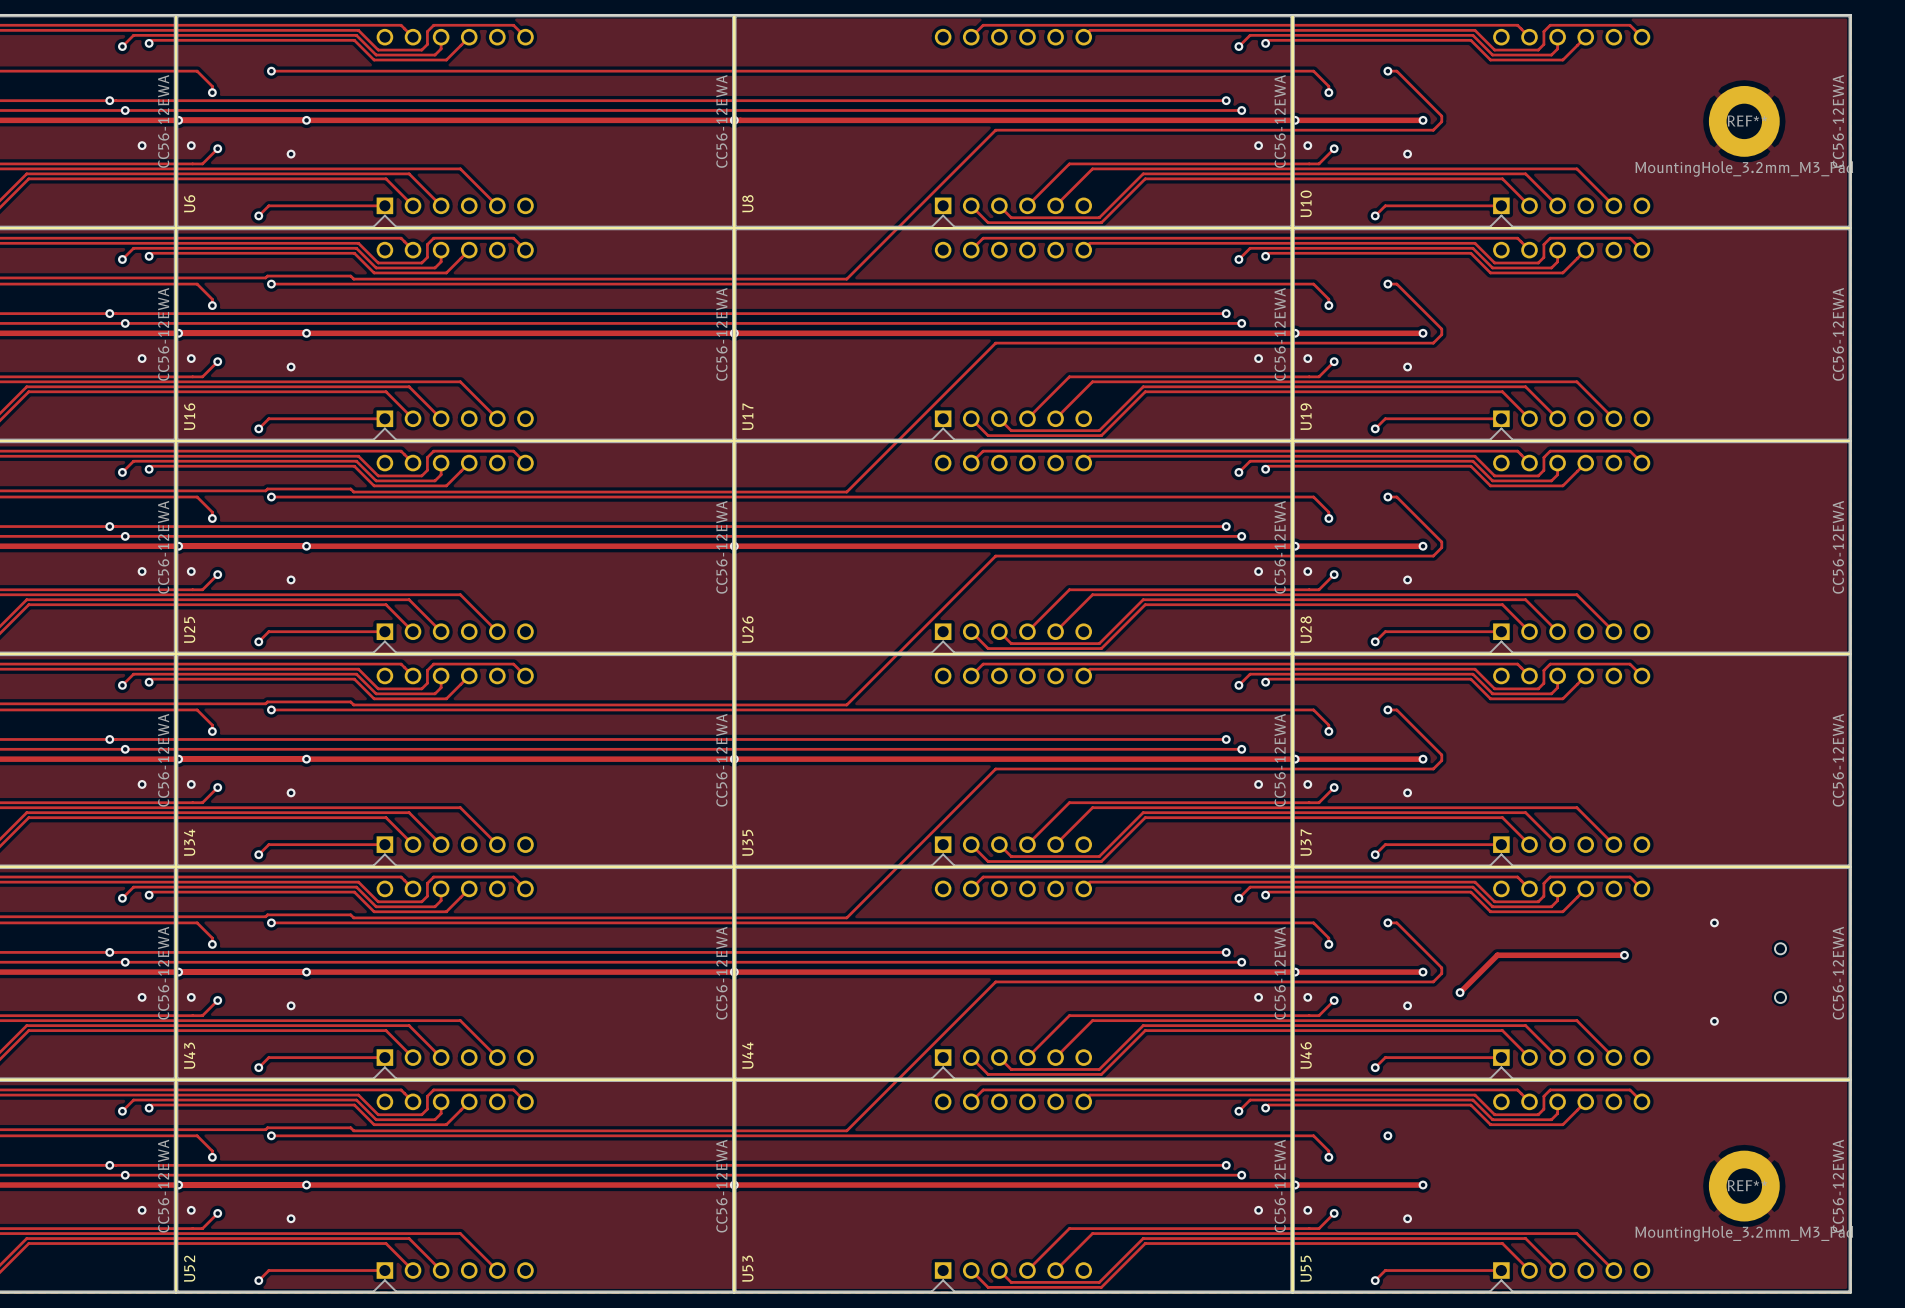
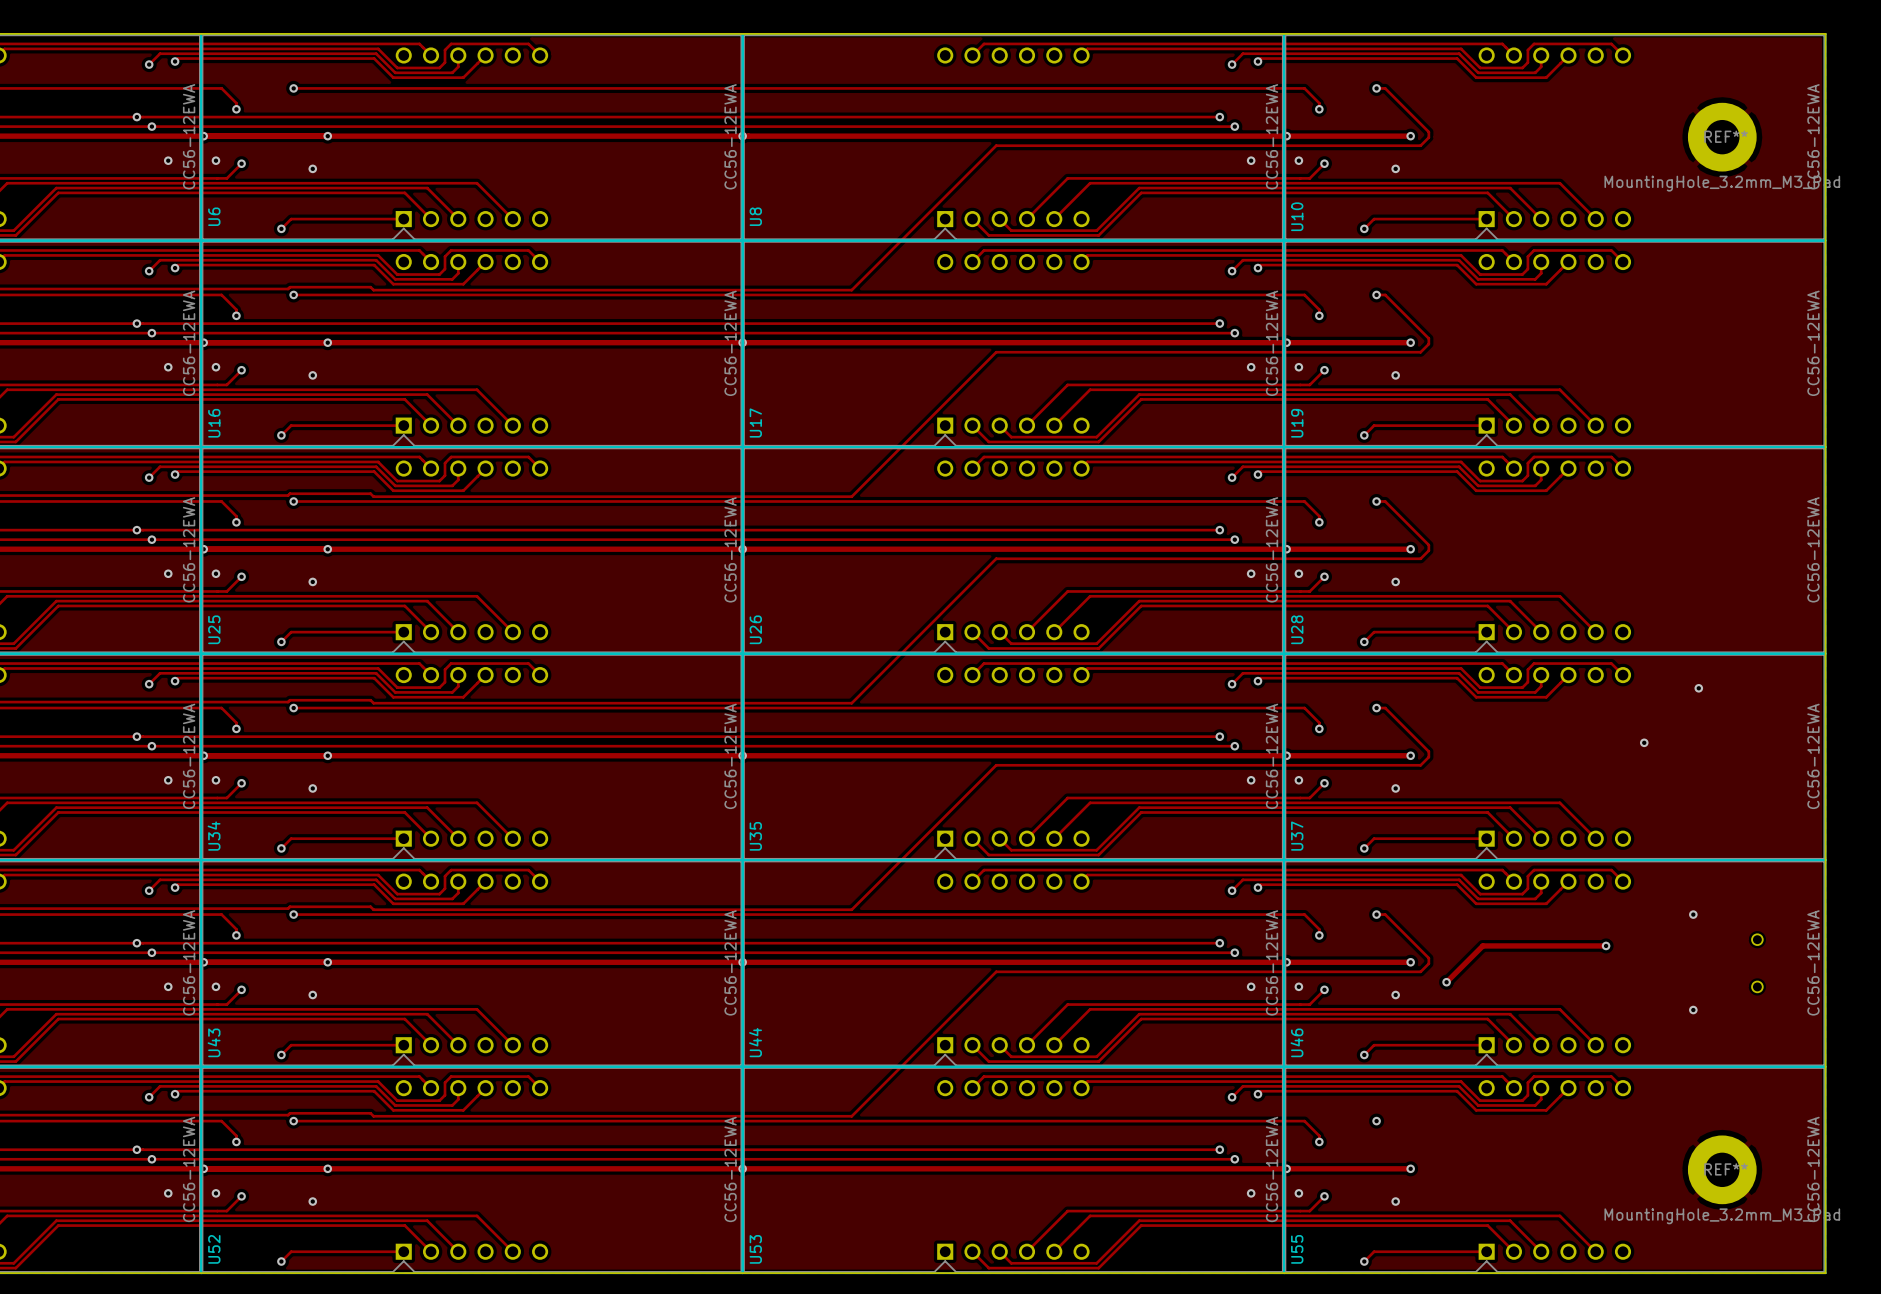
via: none -> (1698, 688)
via: none -> (1644, 742)

